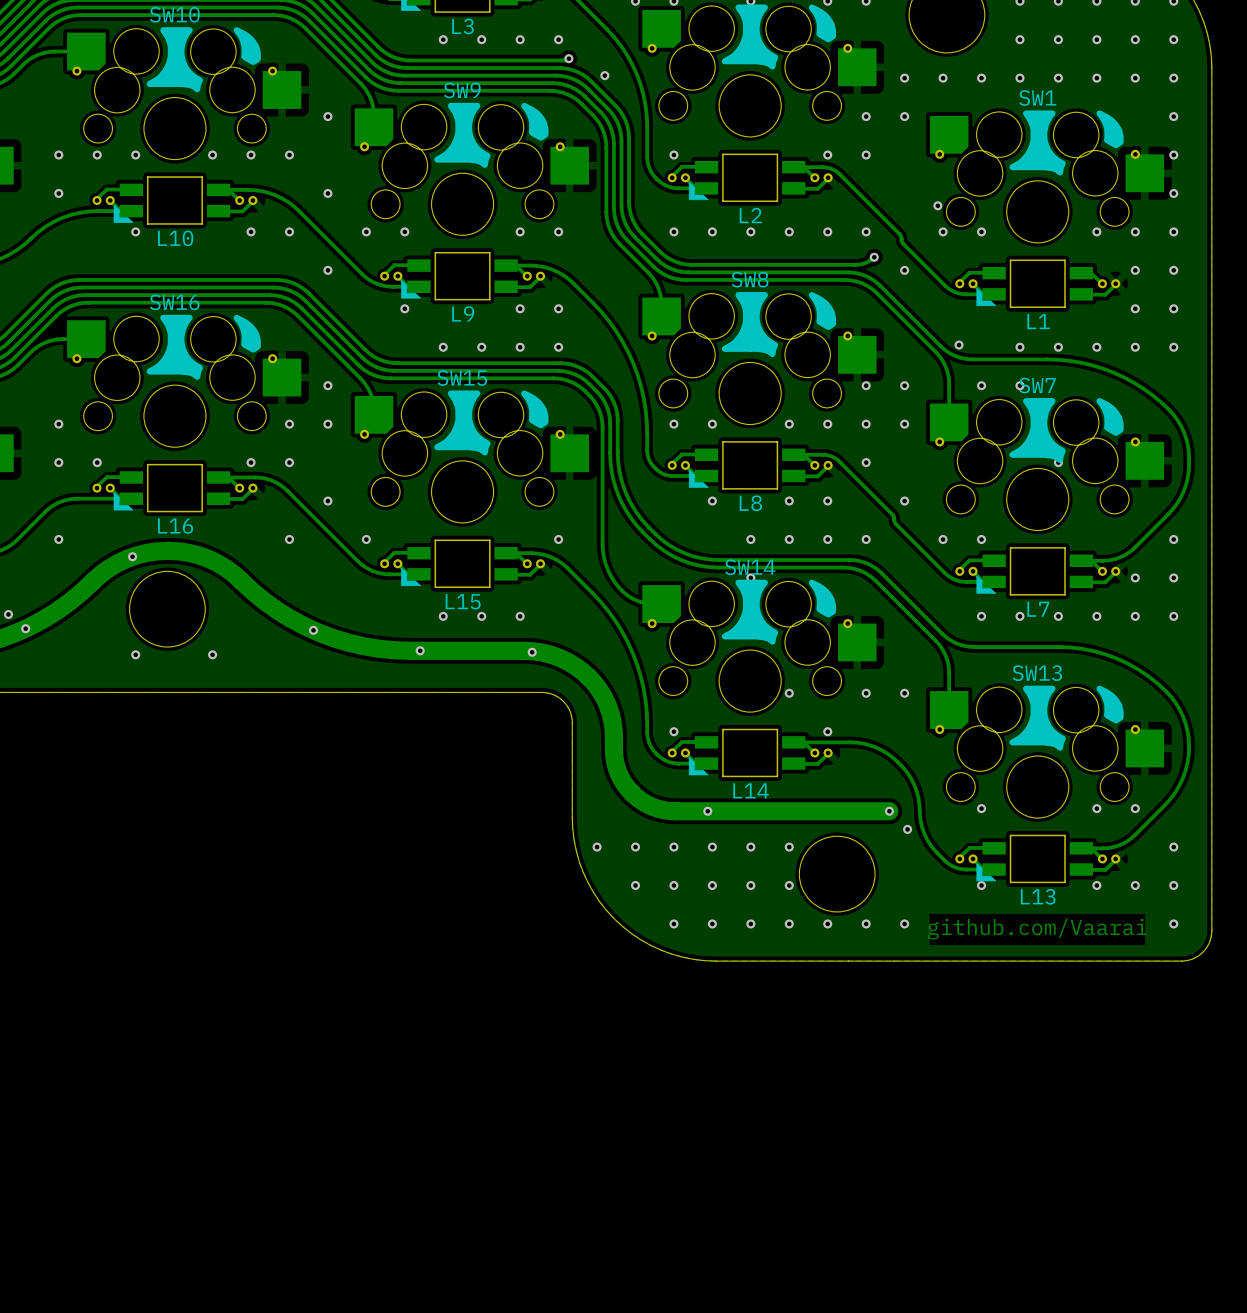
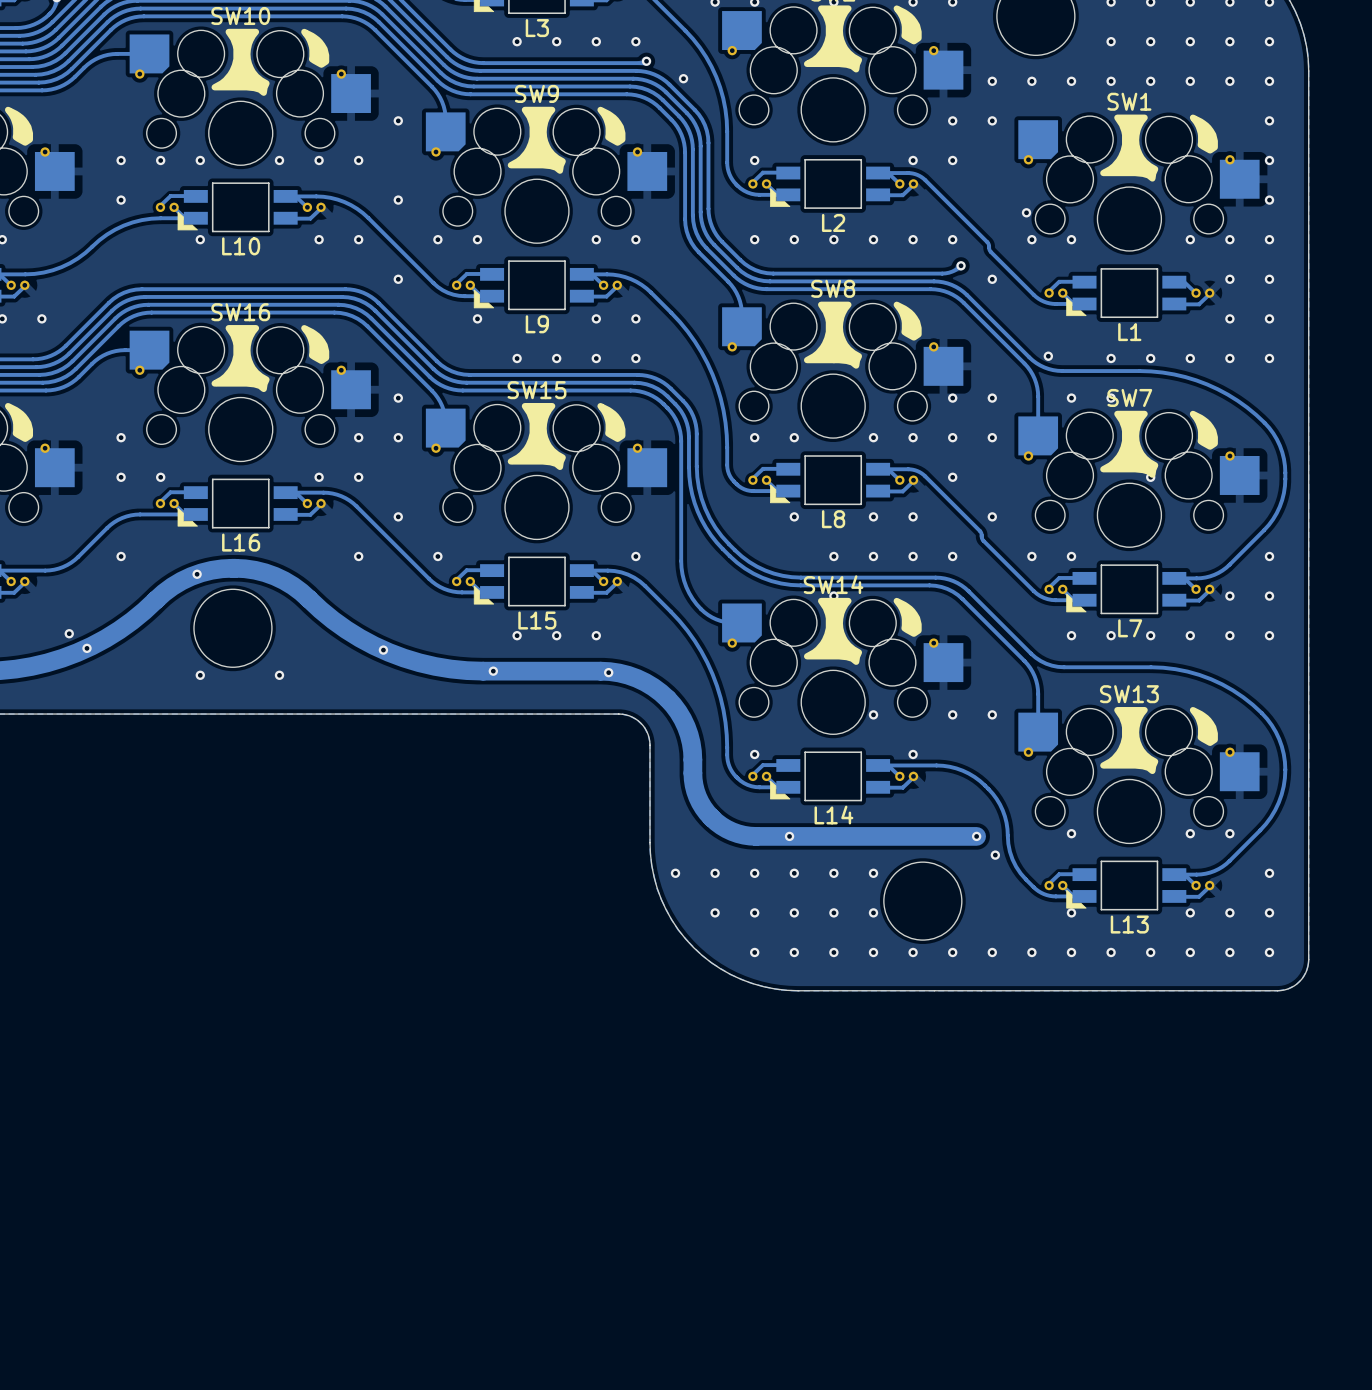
via: none -> (1031, 952)
via: none -> (1071, 952)
via: none -> (1111, 952)
via: none -> (1150, 952)
via: none -> (1190, 952)
via: none -> (1229, 952)
text: github.com/Vaarai (1037, 929) -> none

